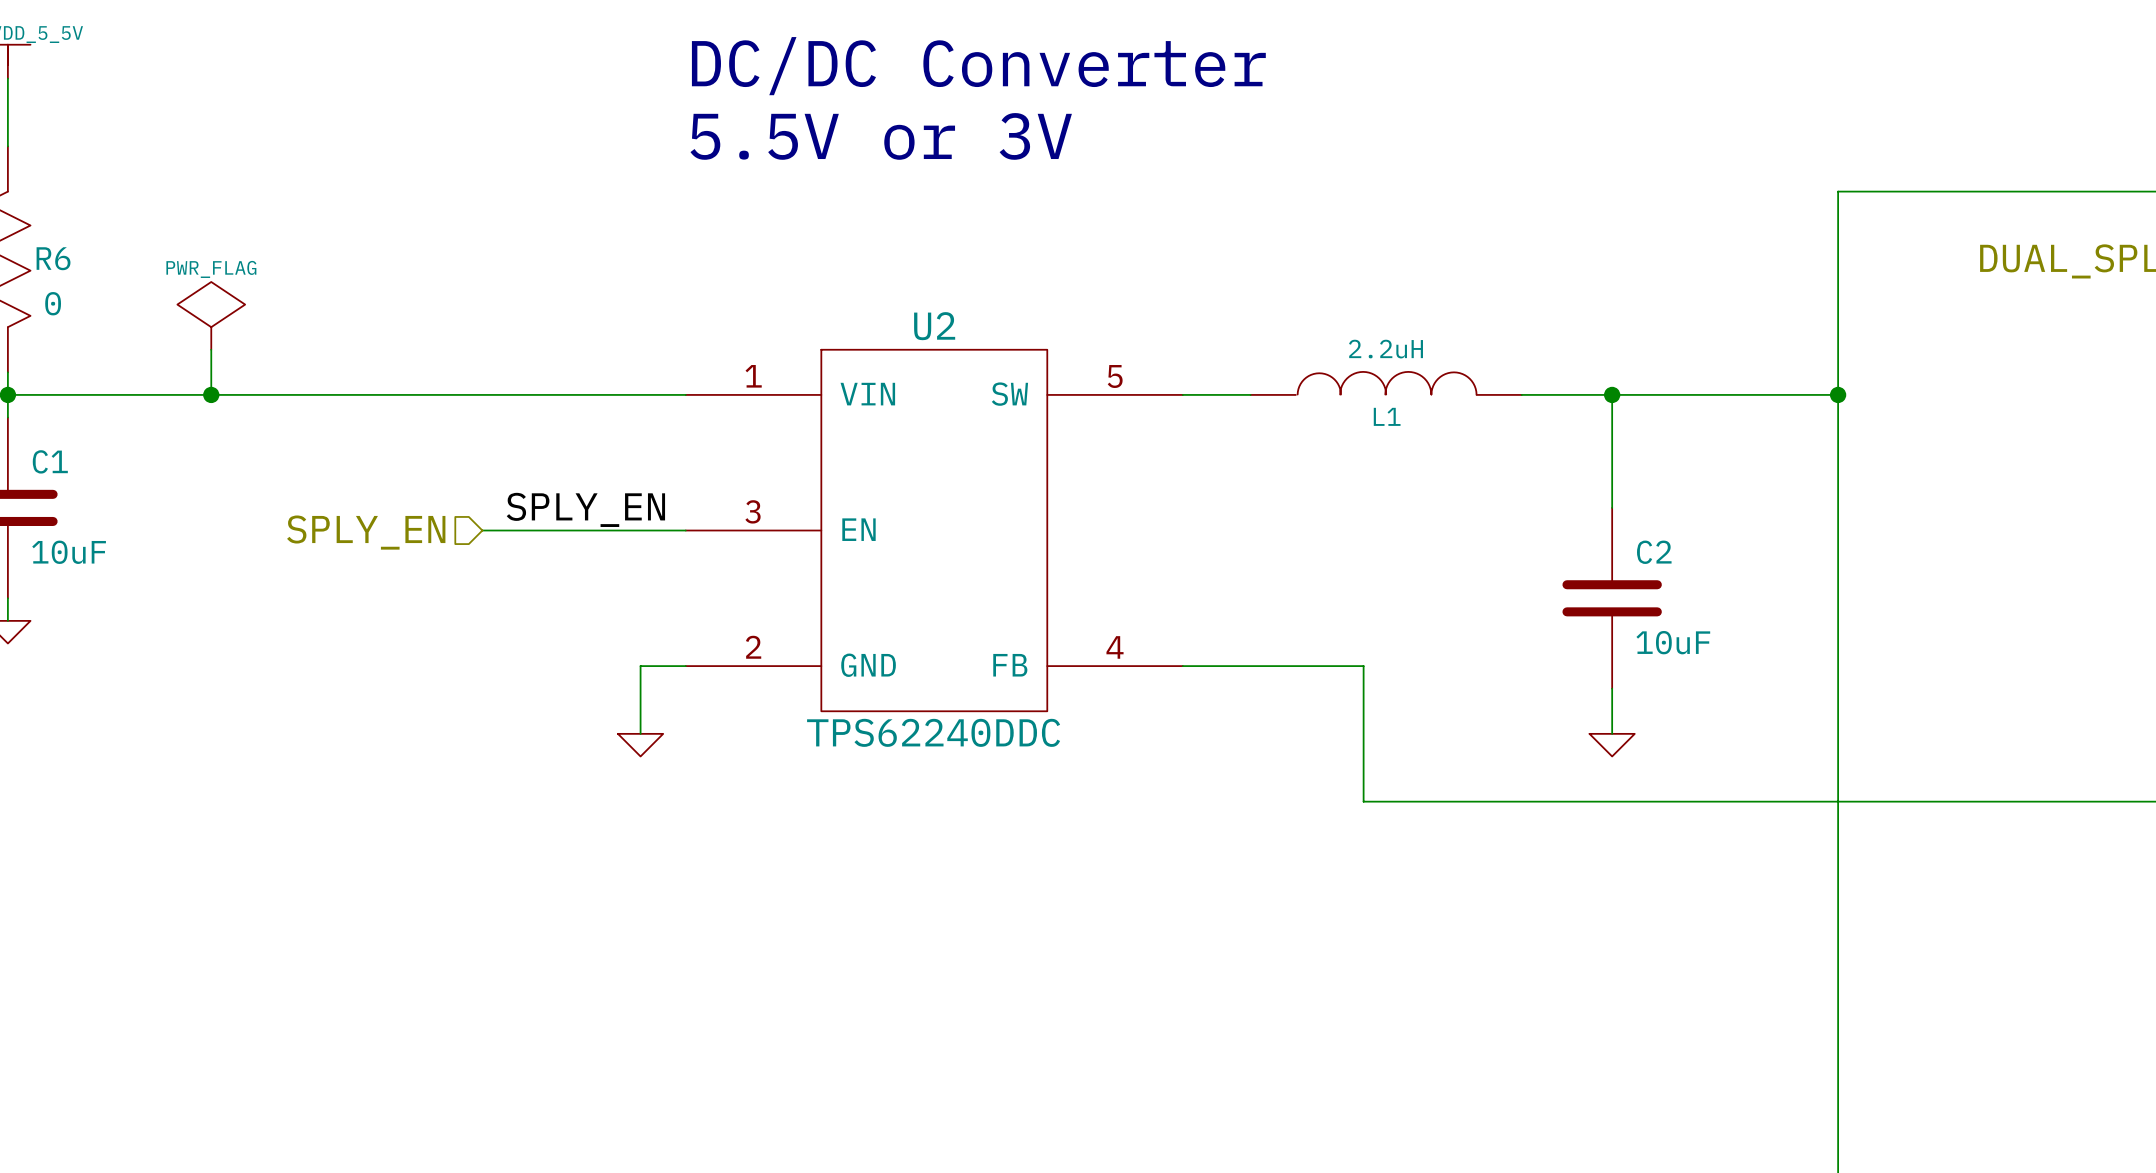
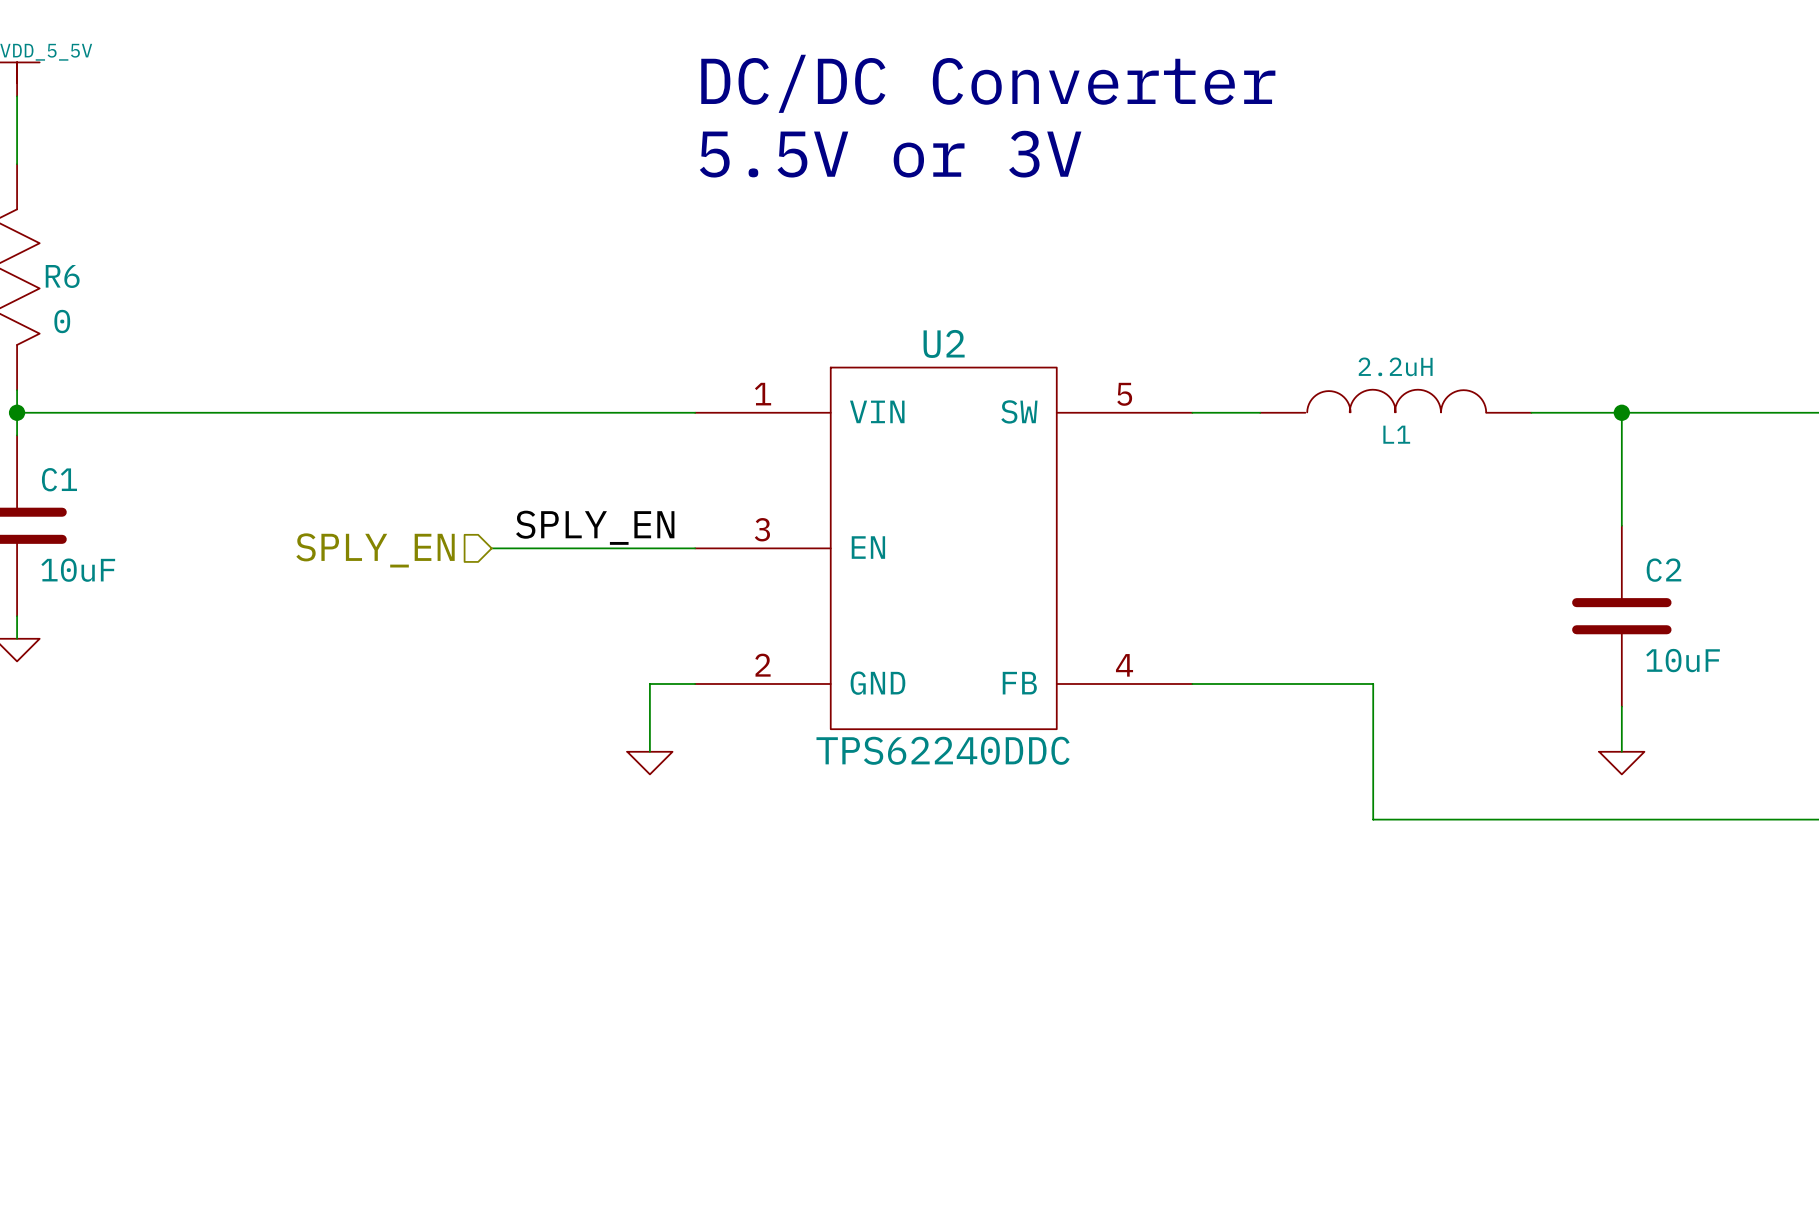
power symbol: PWR_FLAG (211, 315) -> none
wire: (211, 349) (211, 394) -> none
junction: (211, 394) -> none

